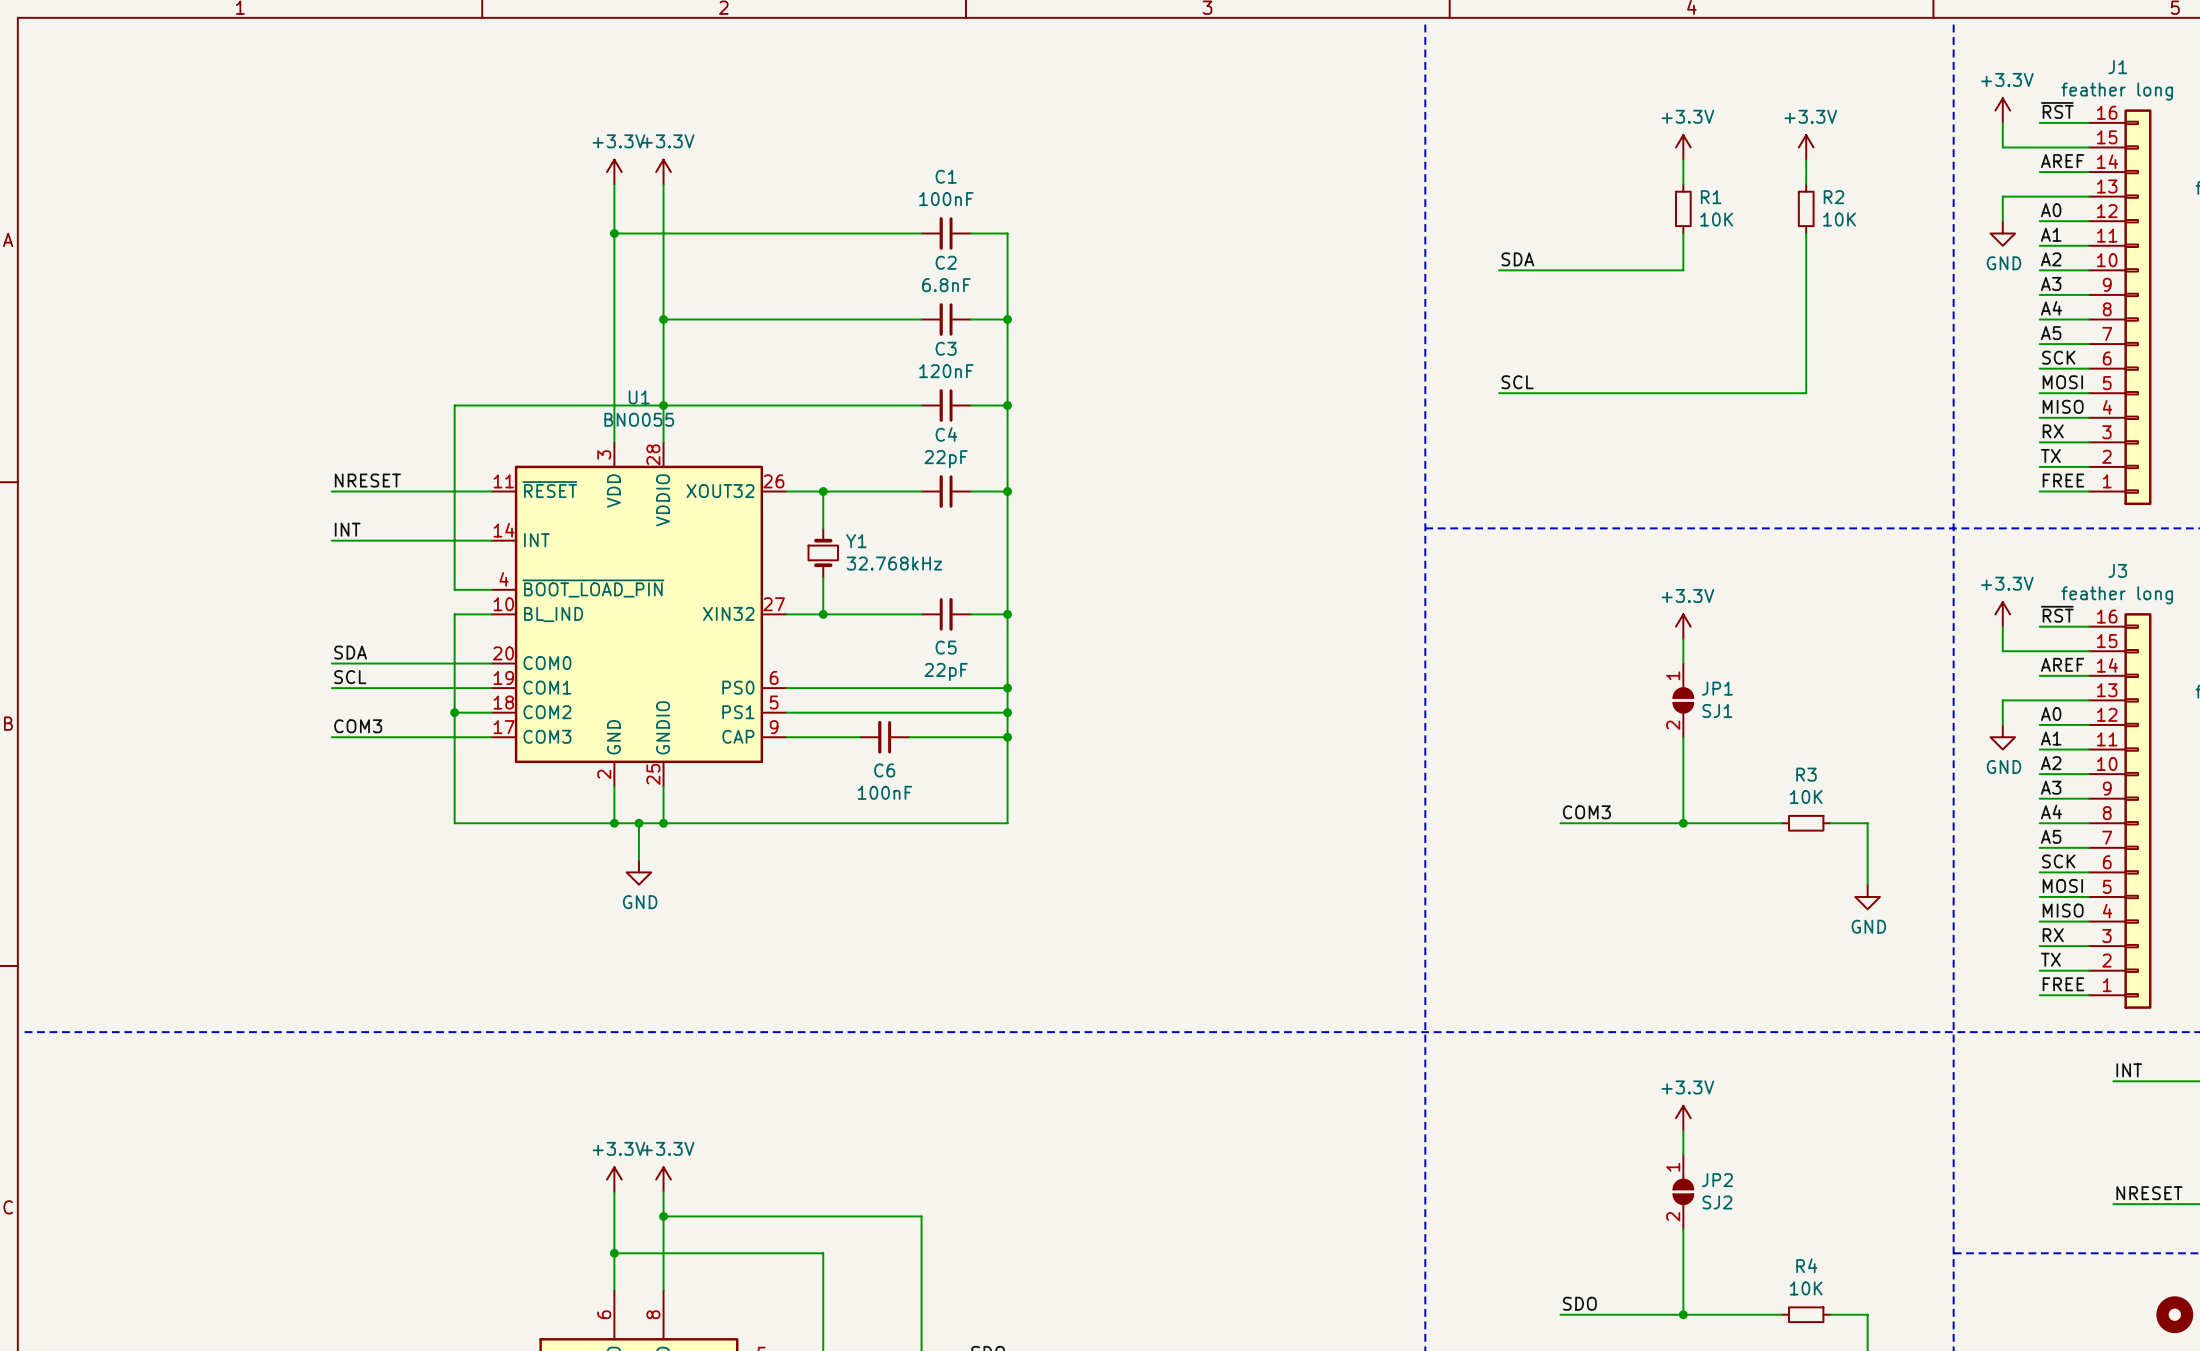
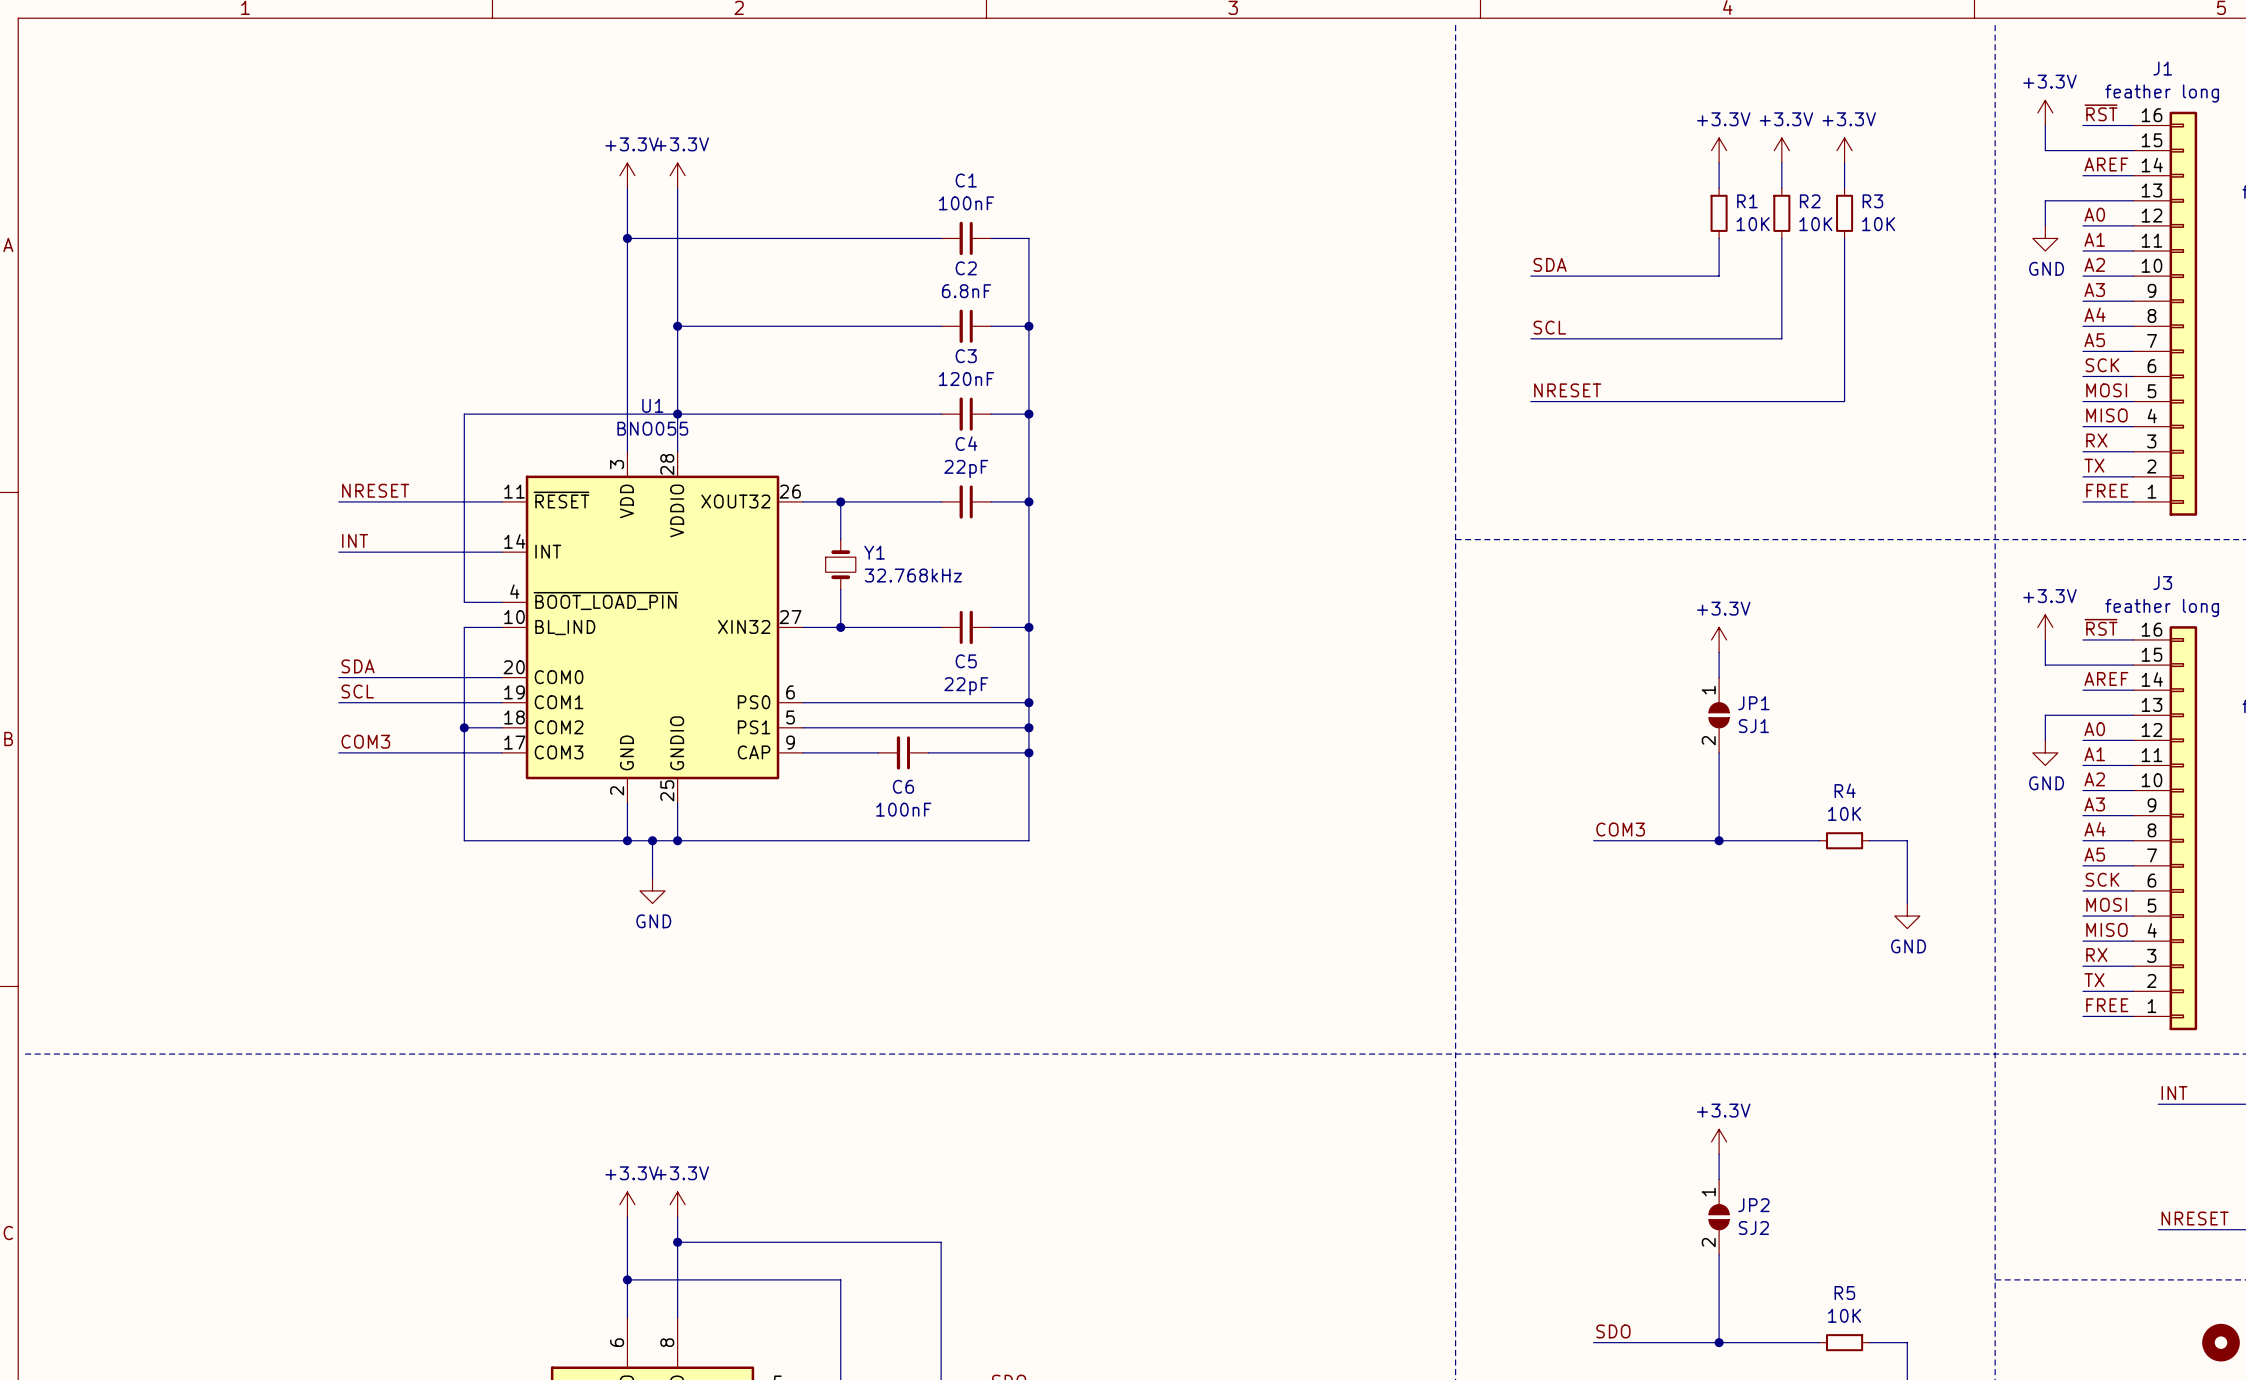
power symbol: none -> +3.3V (1781, 150)
wire: none -> (1781, 163) (1781, 188)
R2 name: R2 (1833, 197) -> R3 (1872, 201)
R2: none -> 10K (1781, 213)
wire: none -> (1781, 238) (1781, 338) (1530, 338)
label: none -> SCL (1549, 327)
label: SCL (1517, 382) -> NRESET (1567, 390)
R3 name: R3 (1806, 774) -> R4 (1845, 790)
R4 name: R4 (1806, 1265) -> R5 (1844, 1293)

